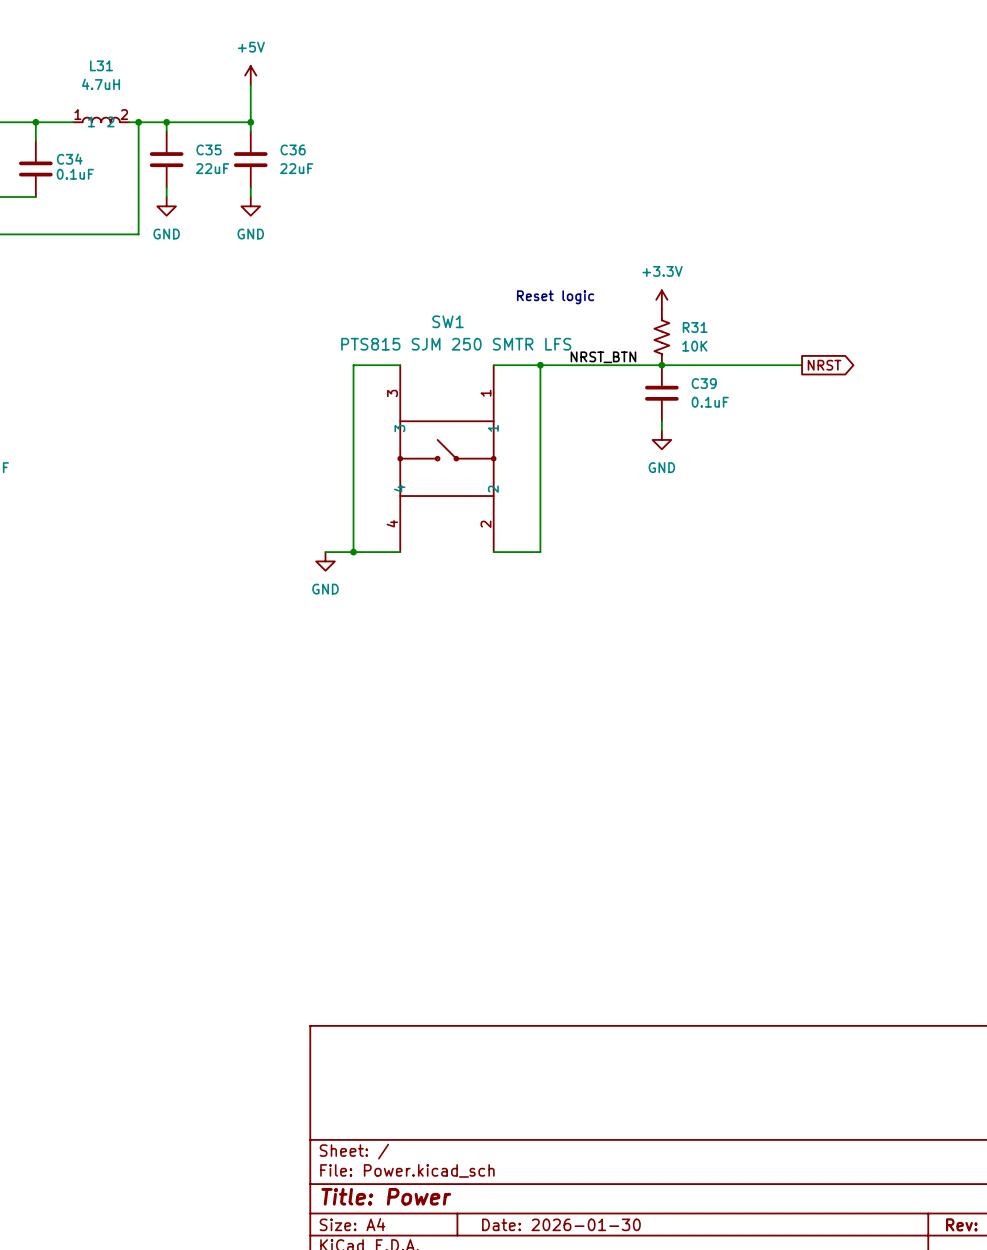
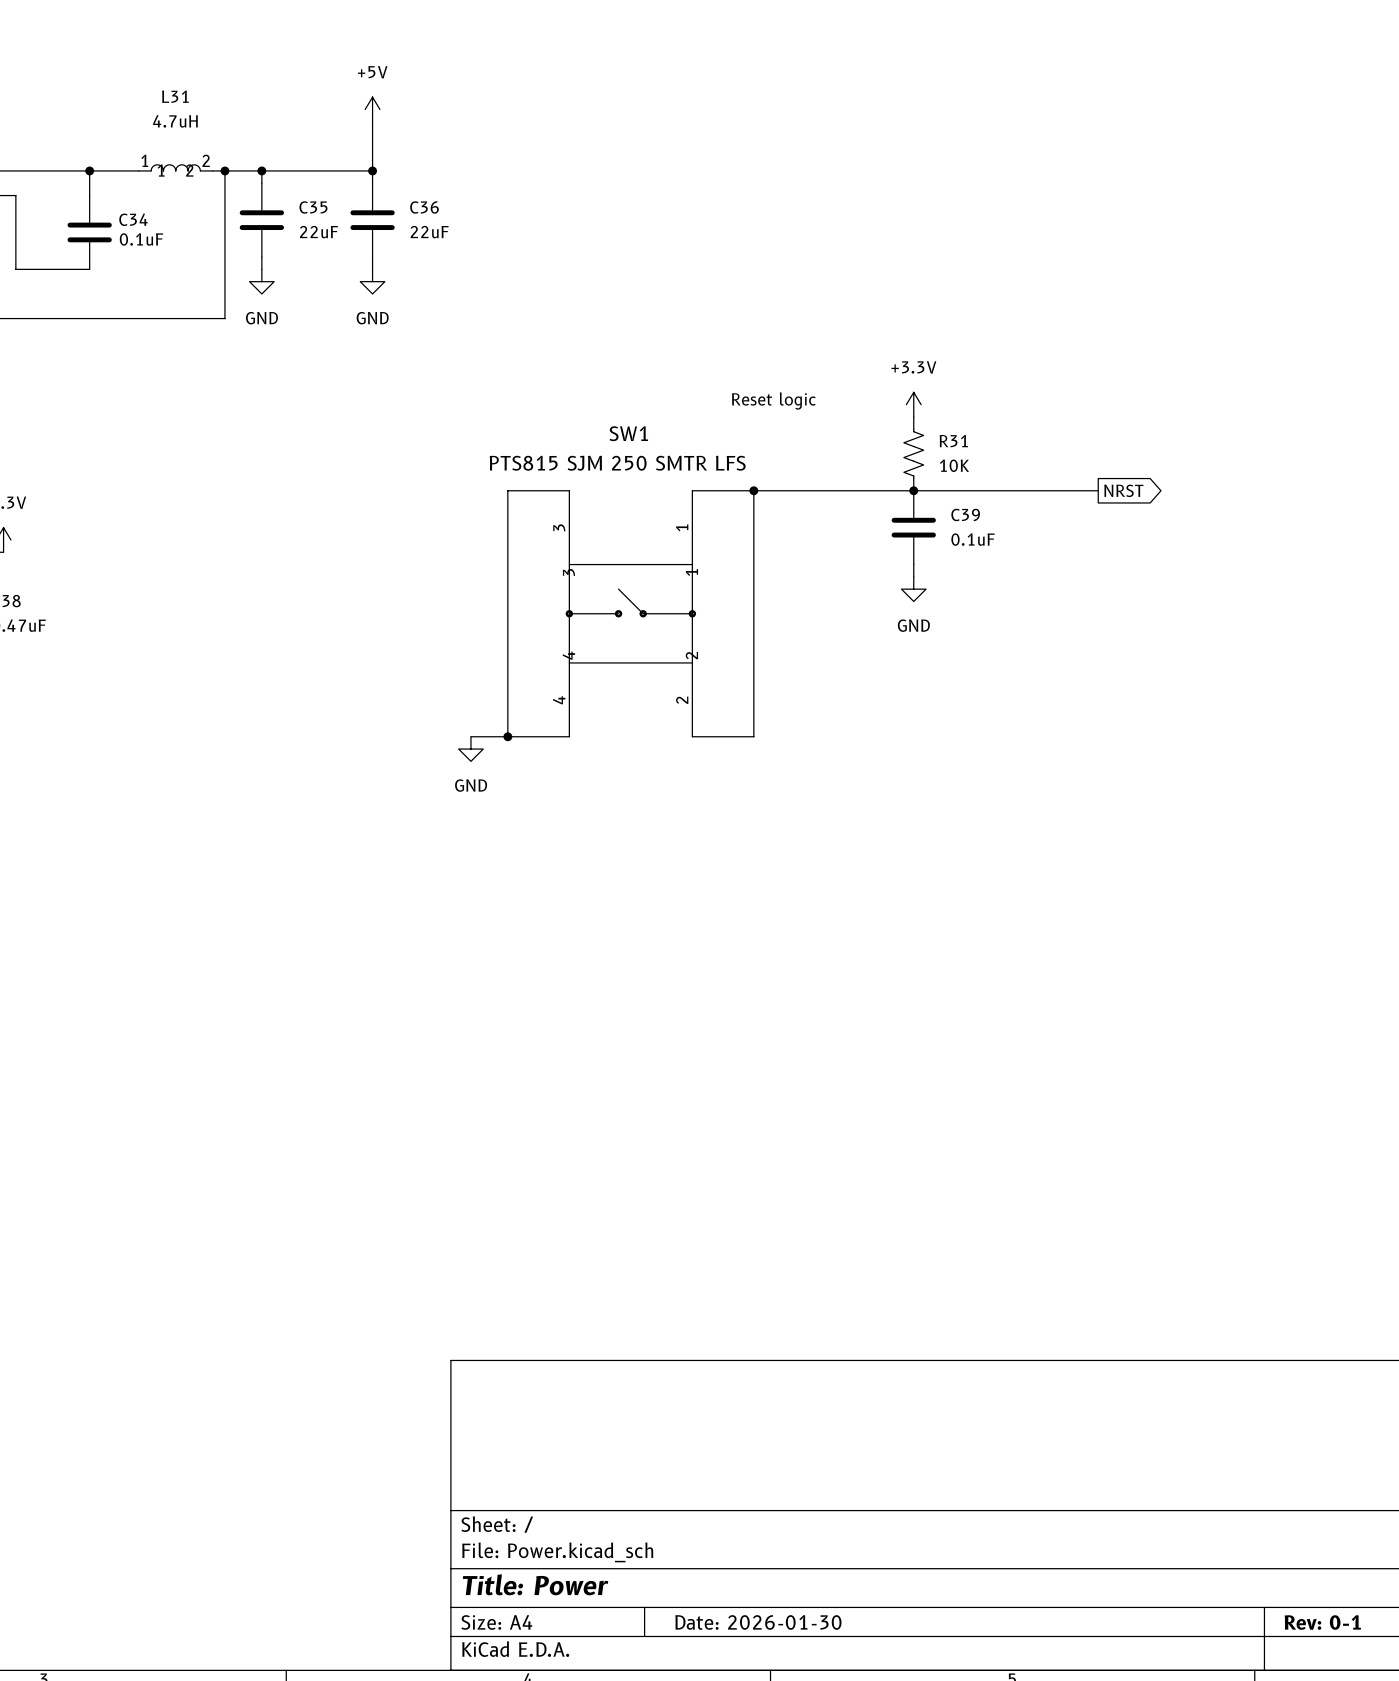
label: NRST_BTN (603, 357) -> none

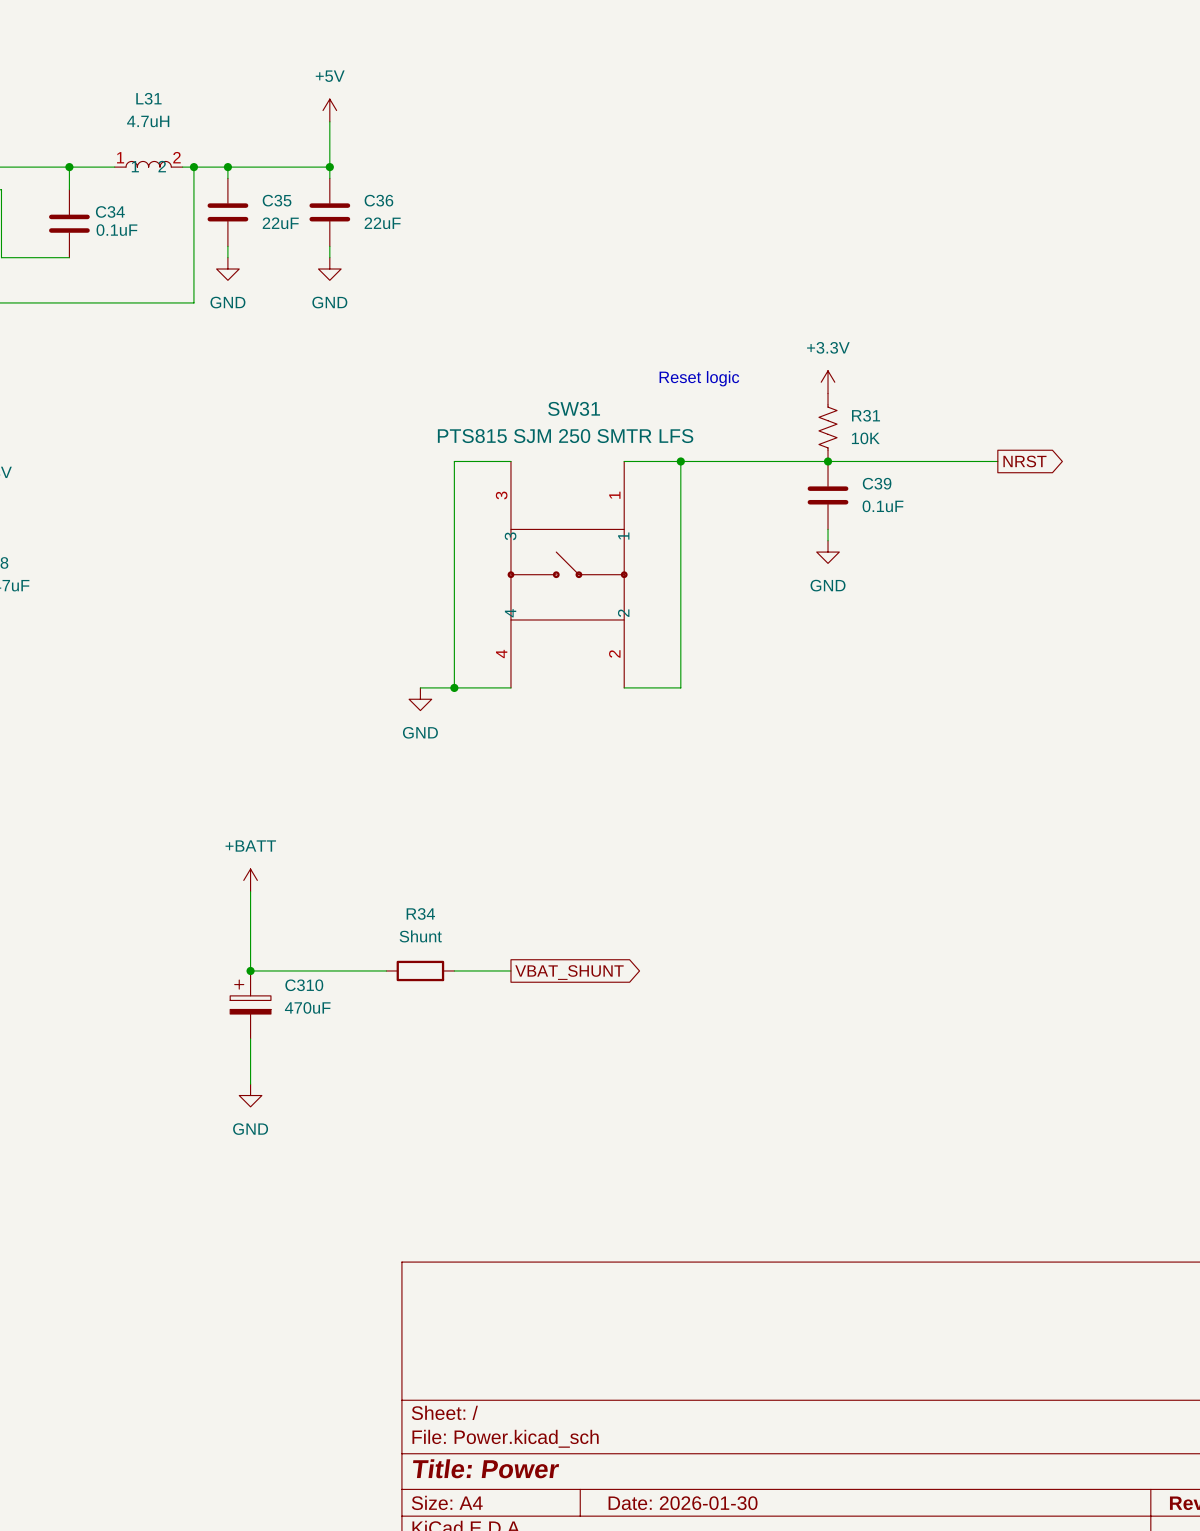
SW1 name: SW1 (628, 433) -> SW31 (574, 408)
power symbol: none -> +BATT (250, 880)
wire: none -> (250, 891) (250, 970) (386, 970)
junction: none -> (250, 970)
R34: none -> Shunt (420, 970)
wire: none -> (454, 970) (510, 970)
global label: none -> VBAT_SHUNT (569, 972)
C310: none -> 470uF (250, 1004)
wire: none -> (250, 1038) (250, 1084)
power symbol: none -> GND (250, 1095)

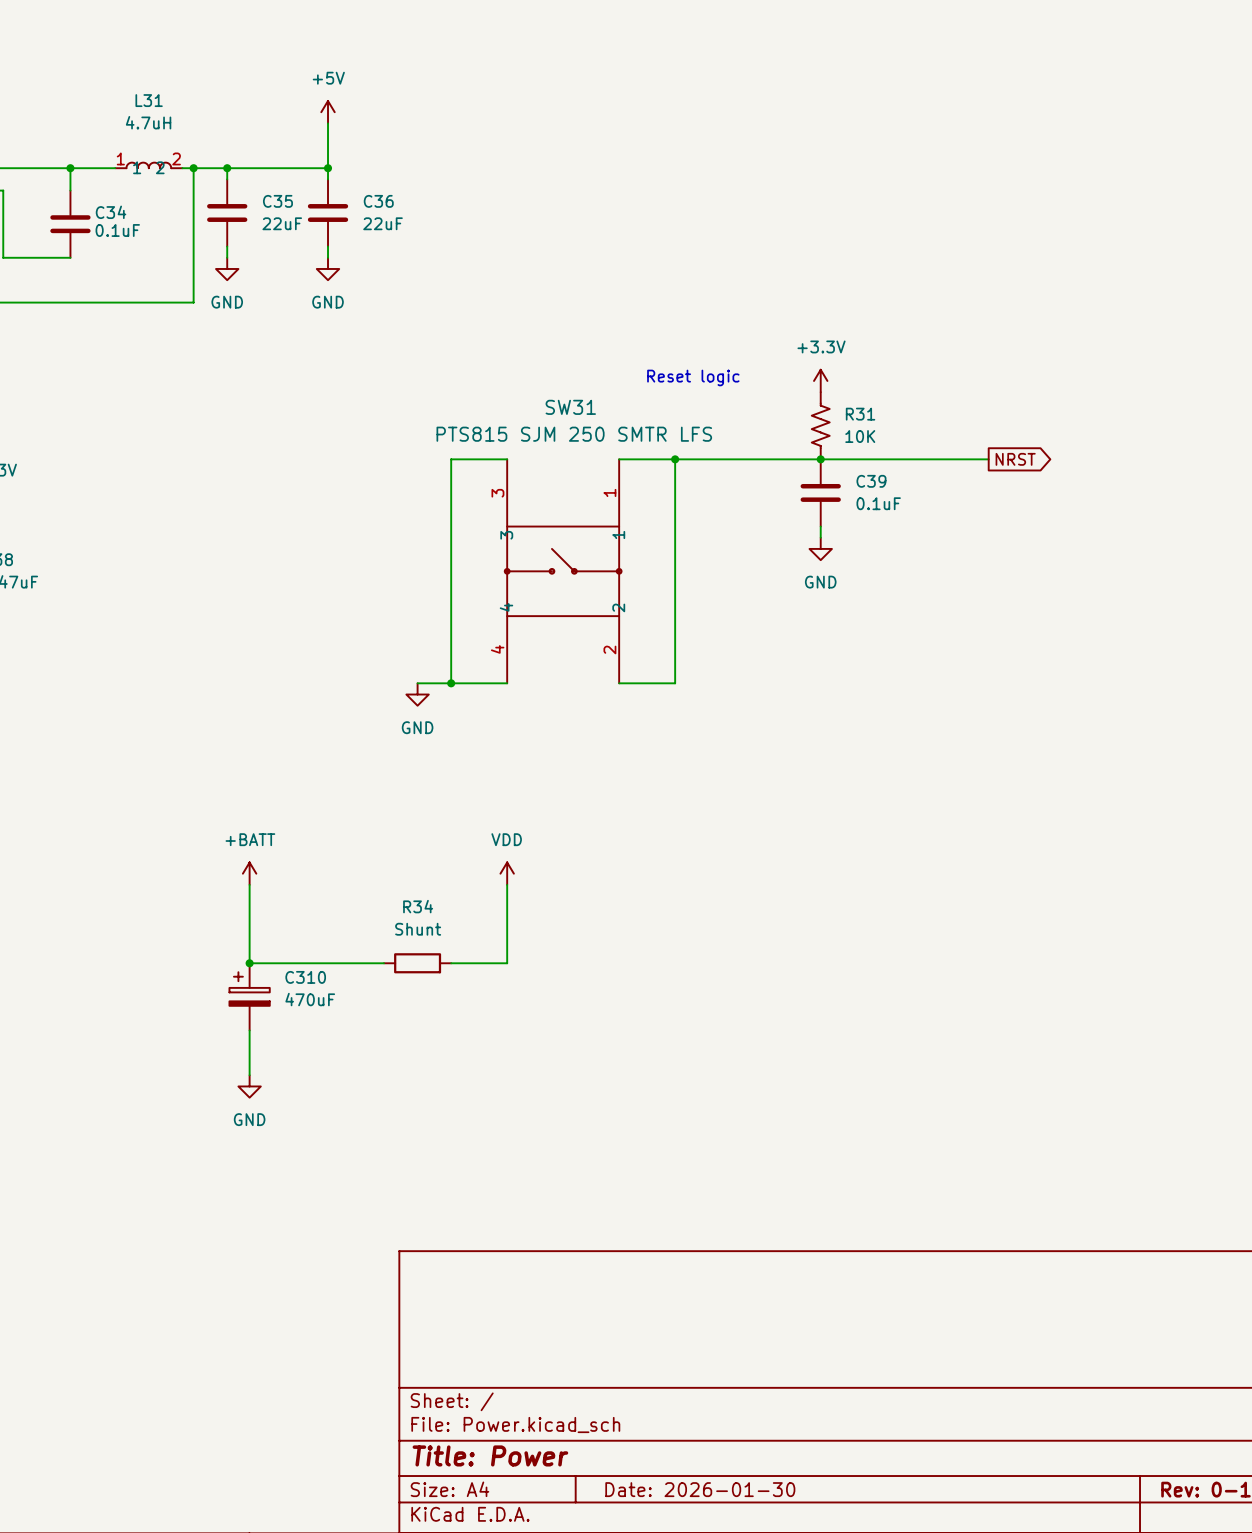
power symbol: none -> VDD (507, 873)
wire: none -> (507, 884) (507, 963)
global label: VBAT_SHUNT (569, 972) -> none

